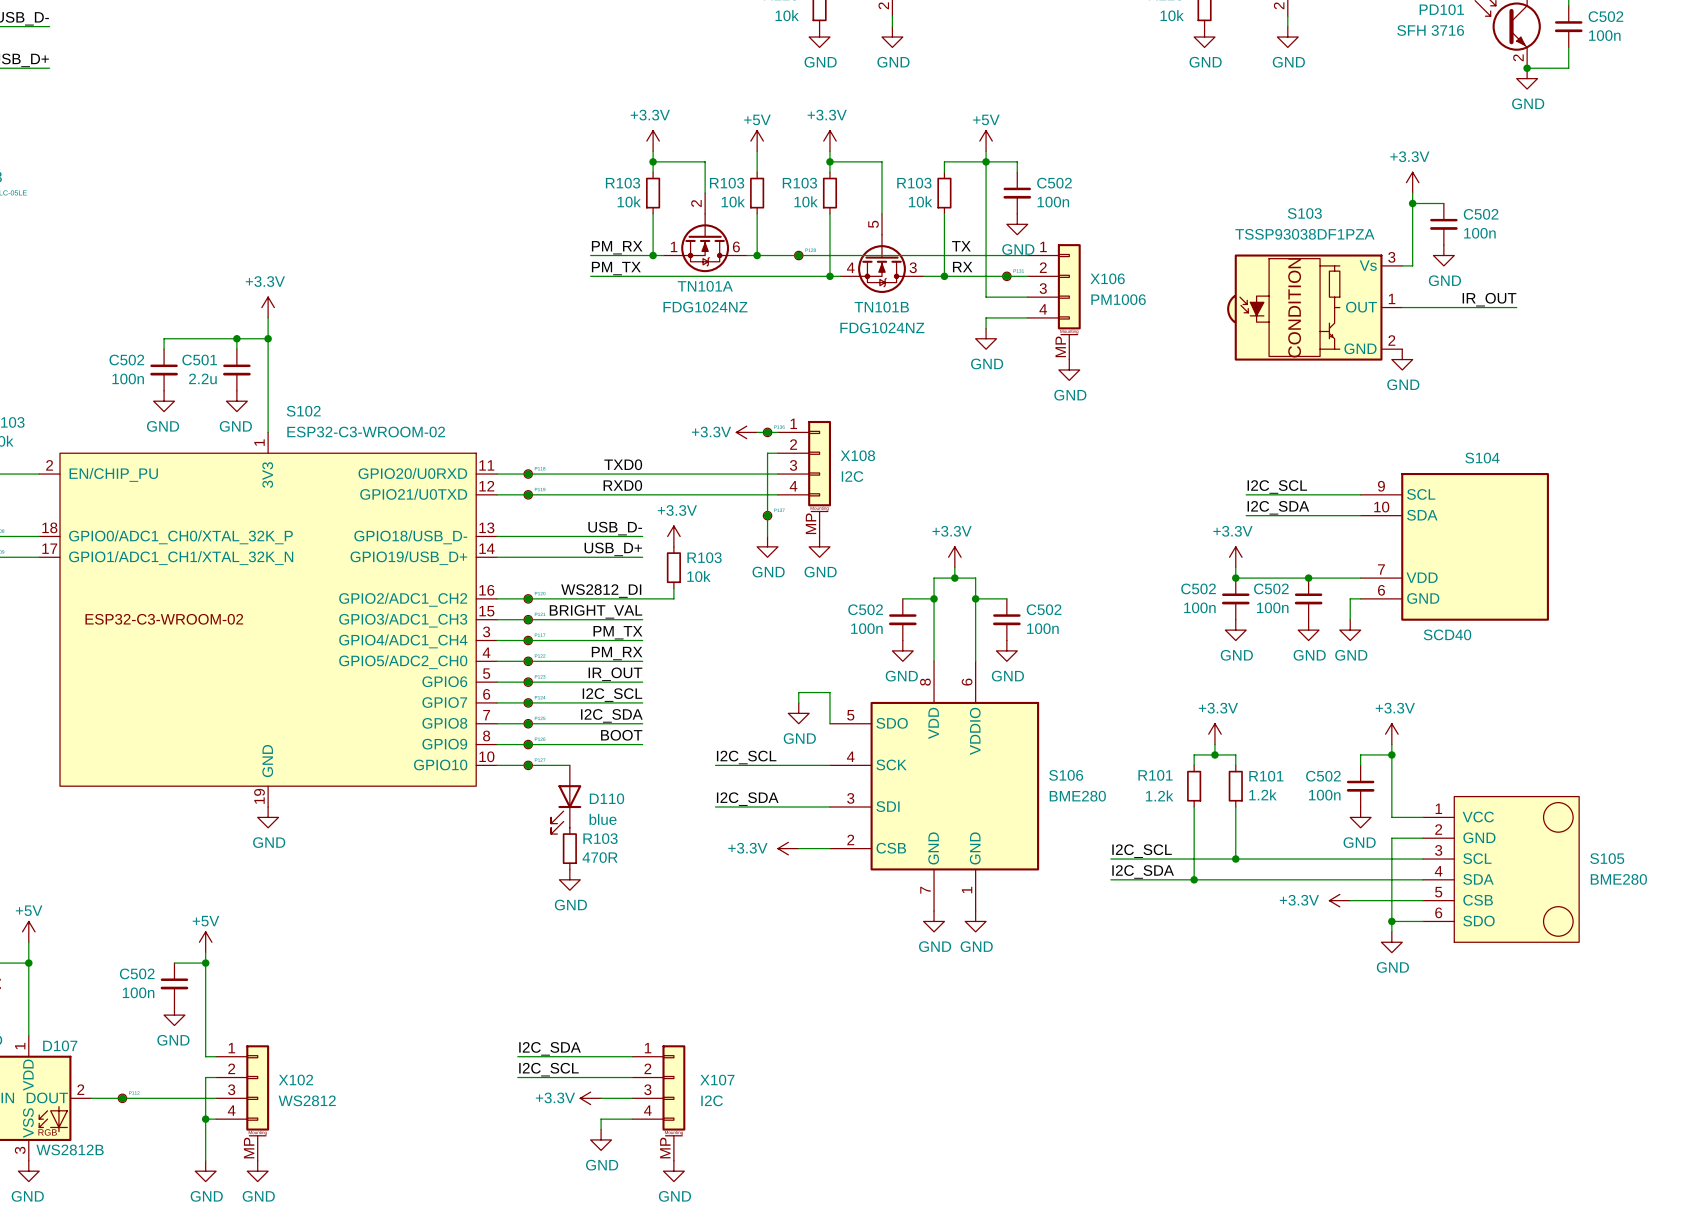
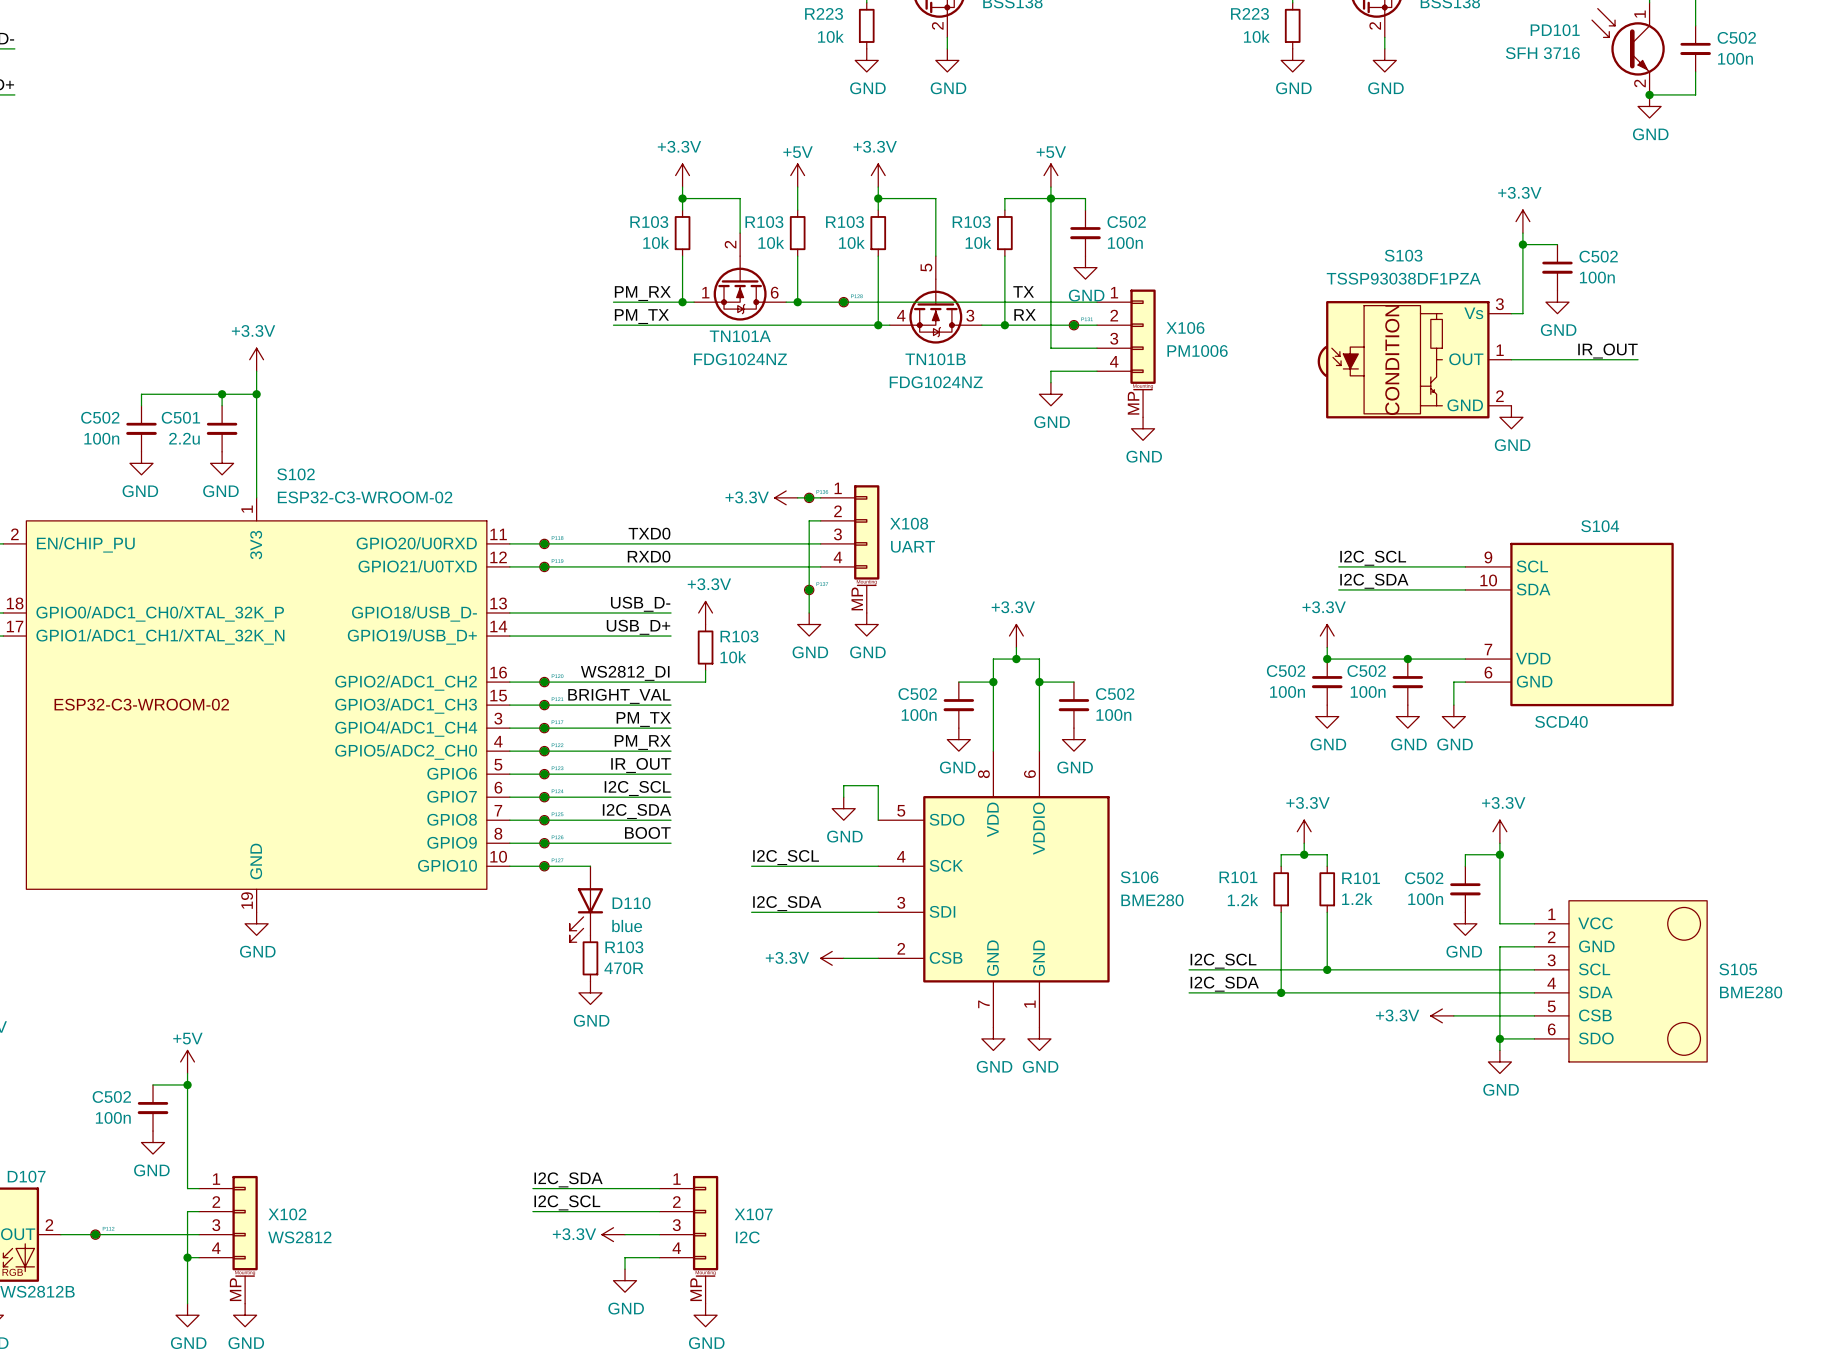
X108 value: I2C (852, 476) -> UART (913, 546)

